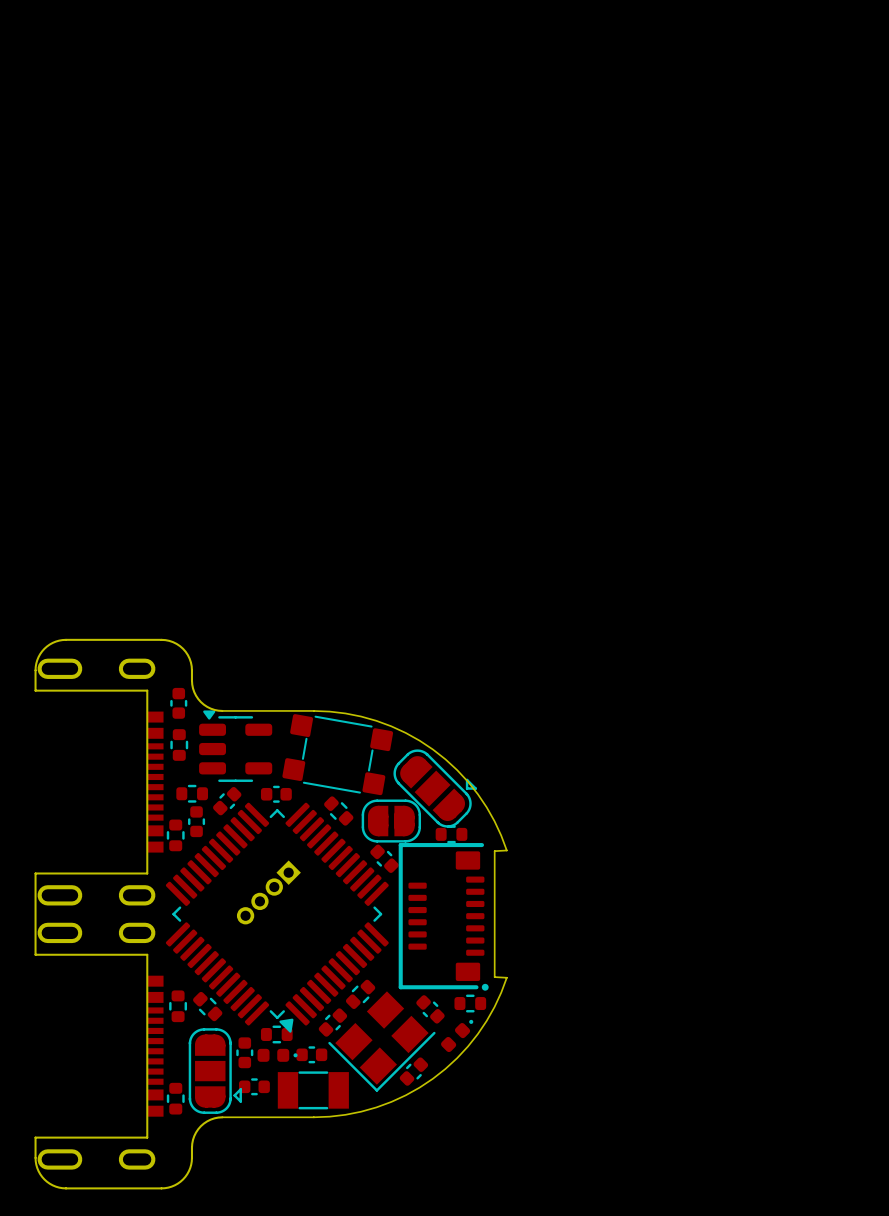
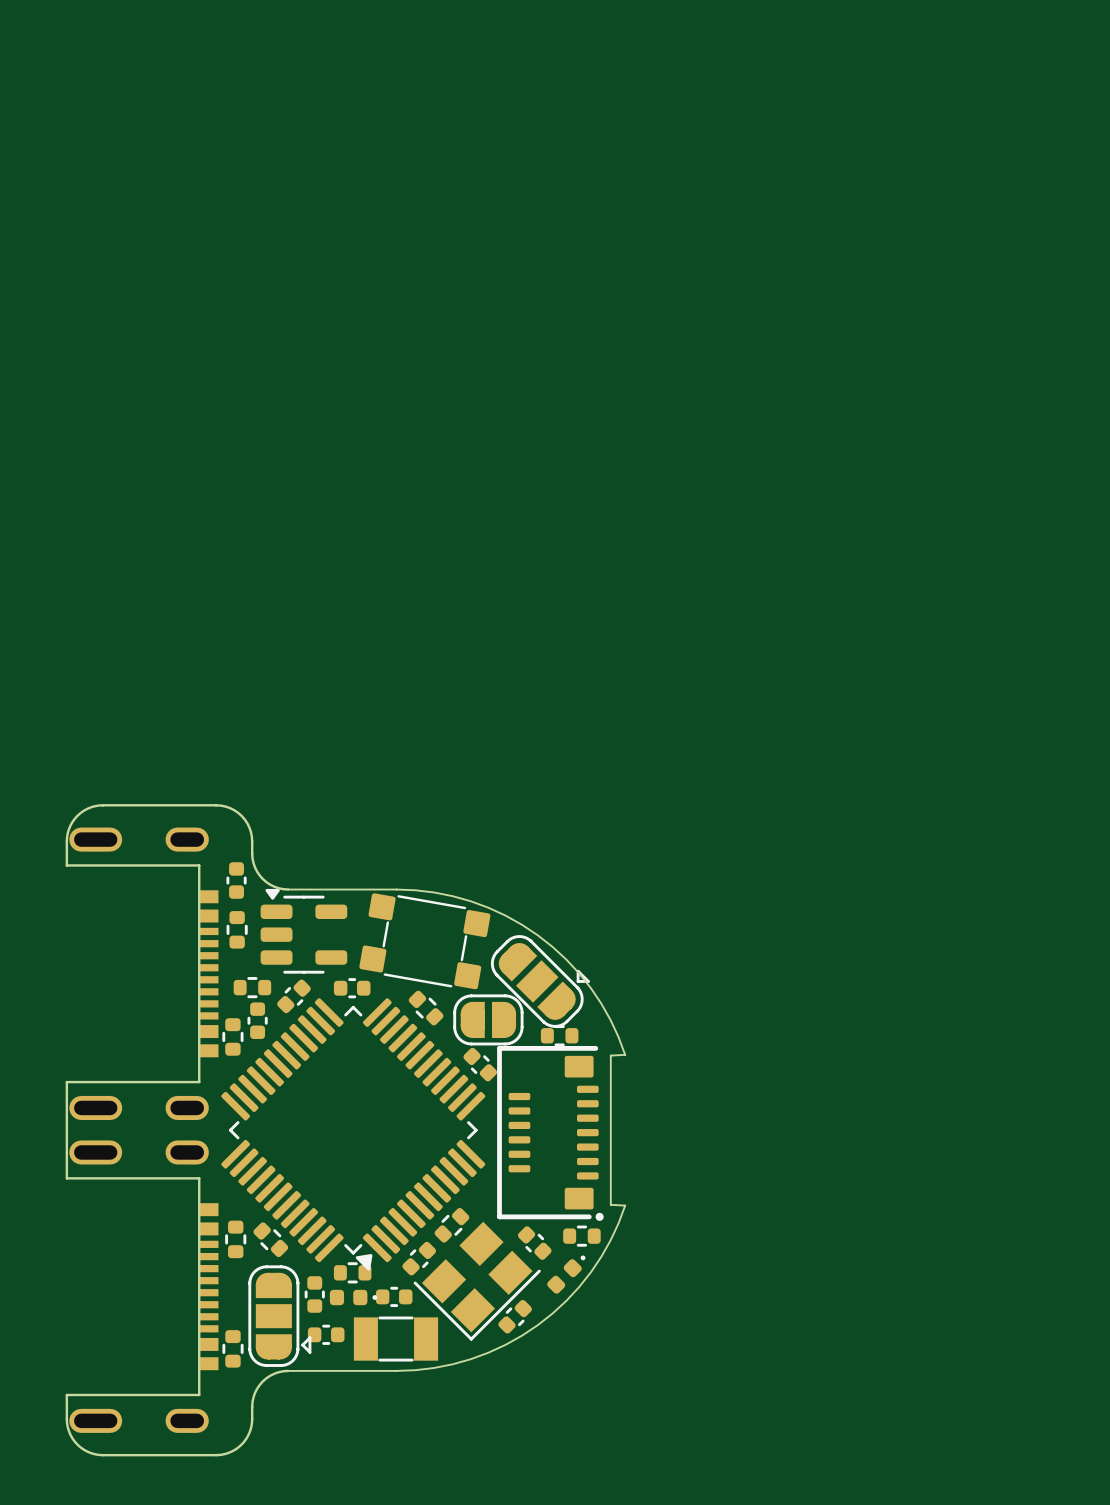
part: (268, 892) -> none

